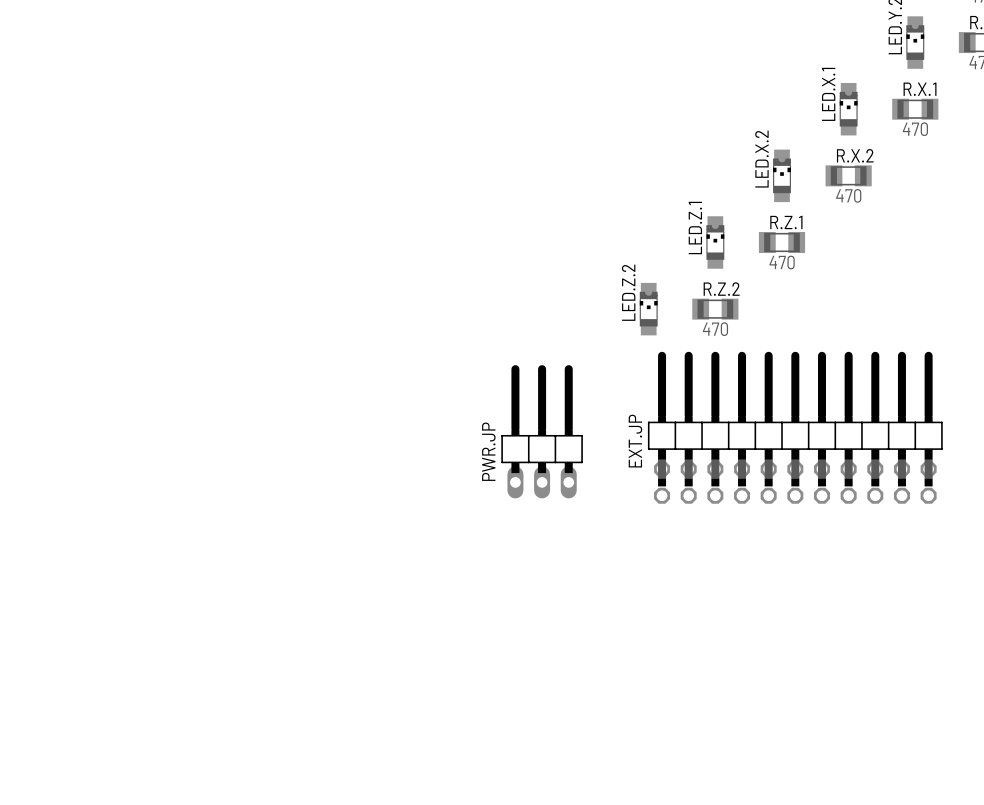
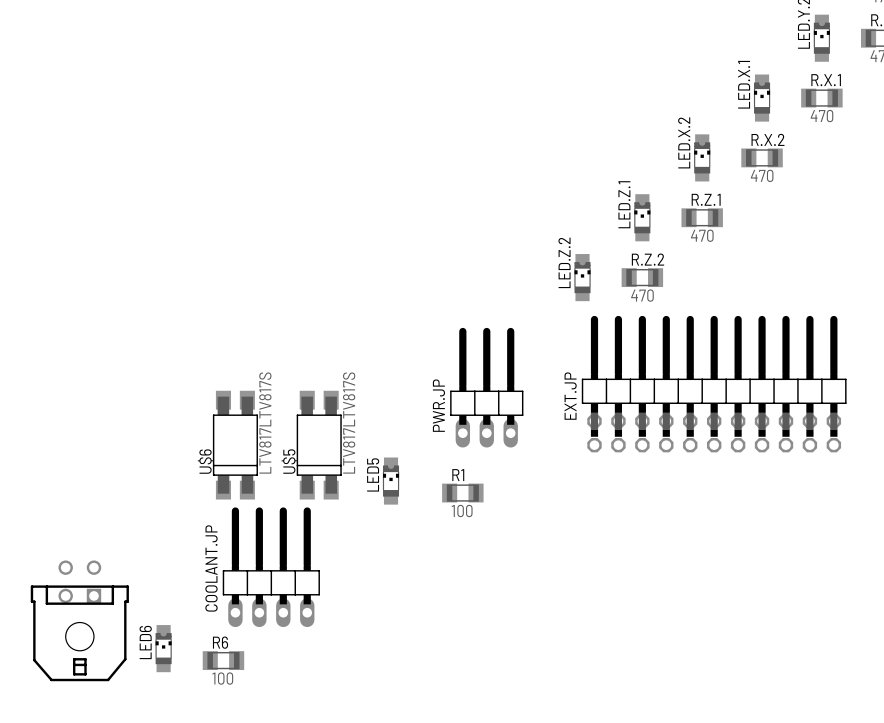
U$6: none -> LTV817LTV817S (235, 445)
U$5: none -> LTV817LTV817S (319, 445)
LED5: none -> (391, 481)
R1: none -> 100 (462, 493)
COOLANT.JP: none -> (271, 567)
part: none -> (79, 620)
LED6: none -> (163, 648)
R6: none -> 100 (223, 660)

